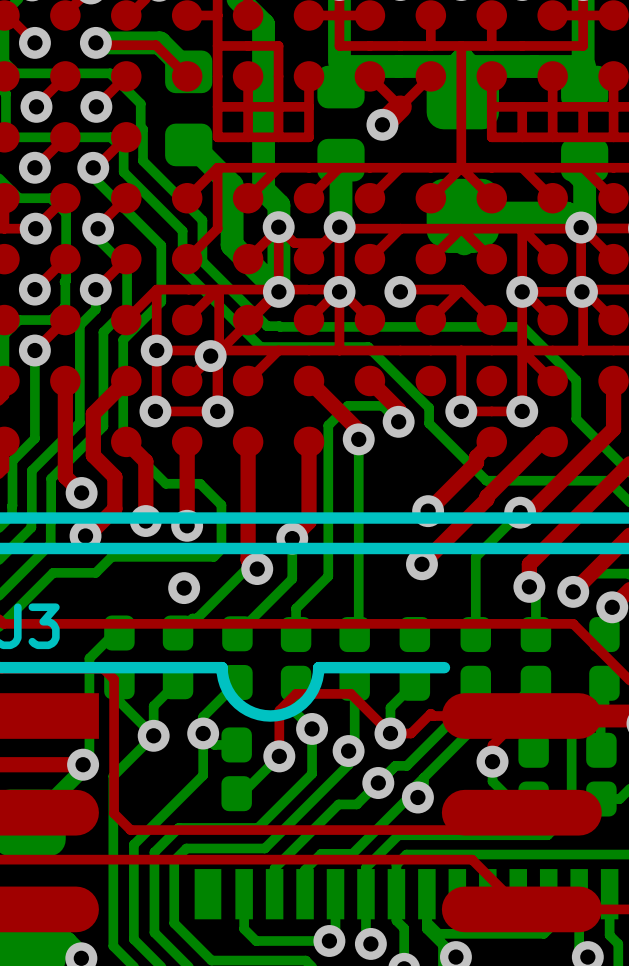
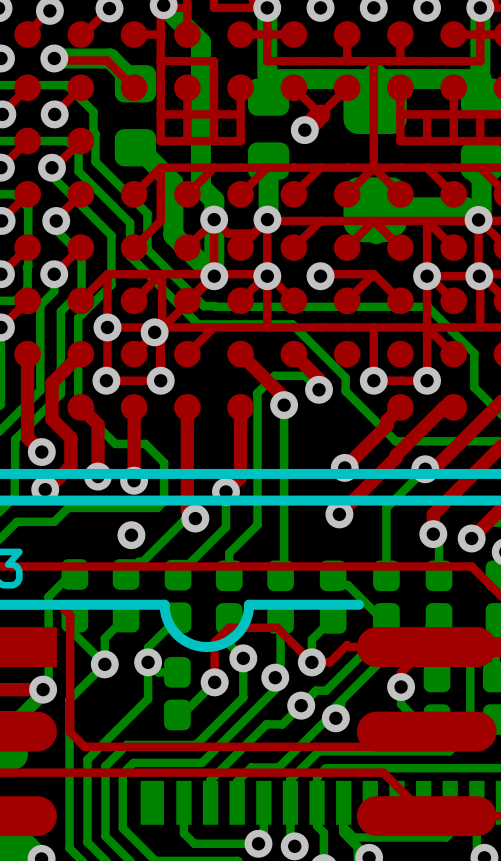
bottom track: none -> (340, 583) (347, 585) (381, 618) (386, 618)

